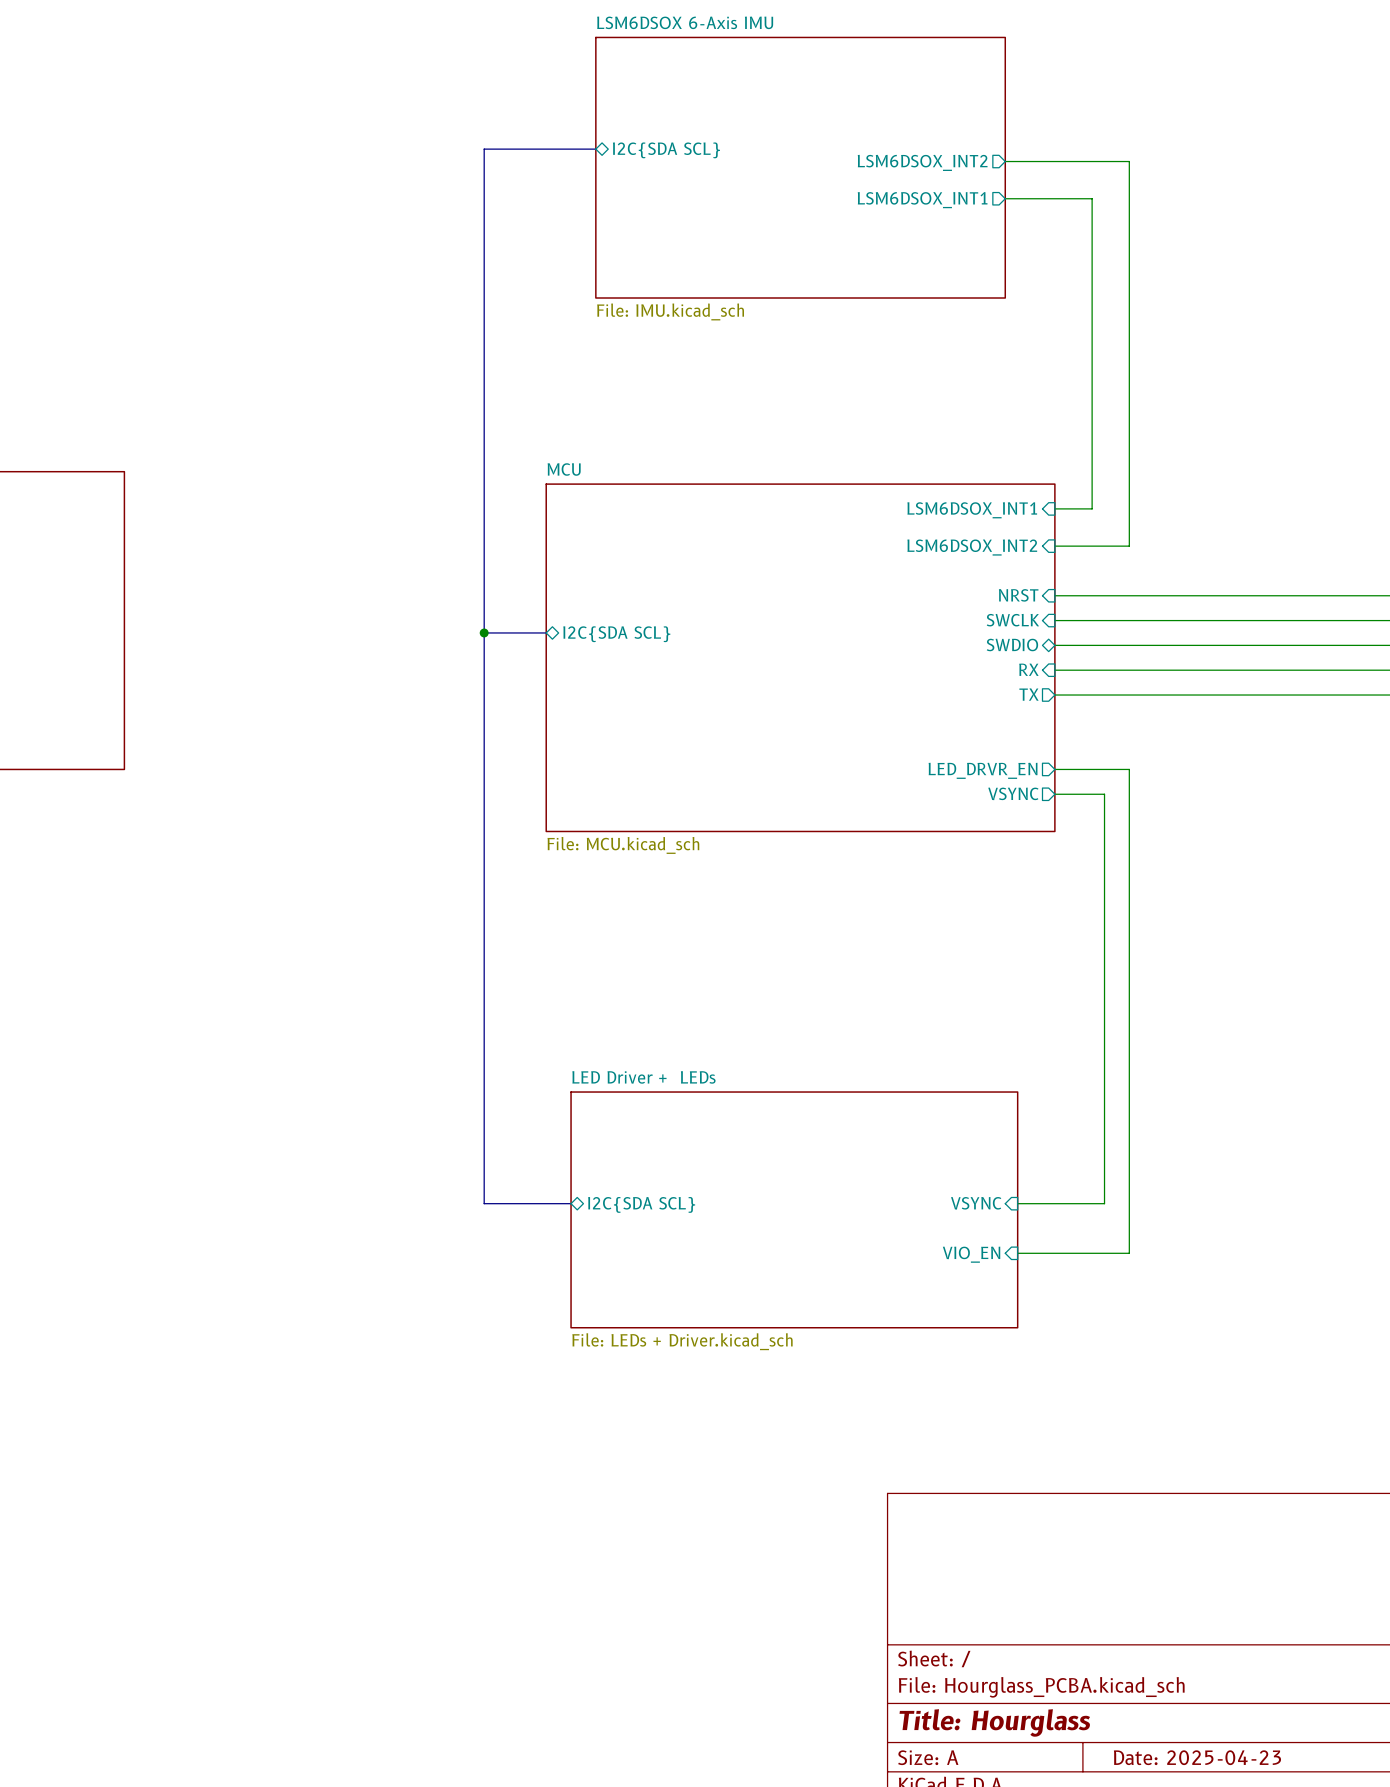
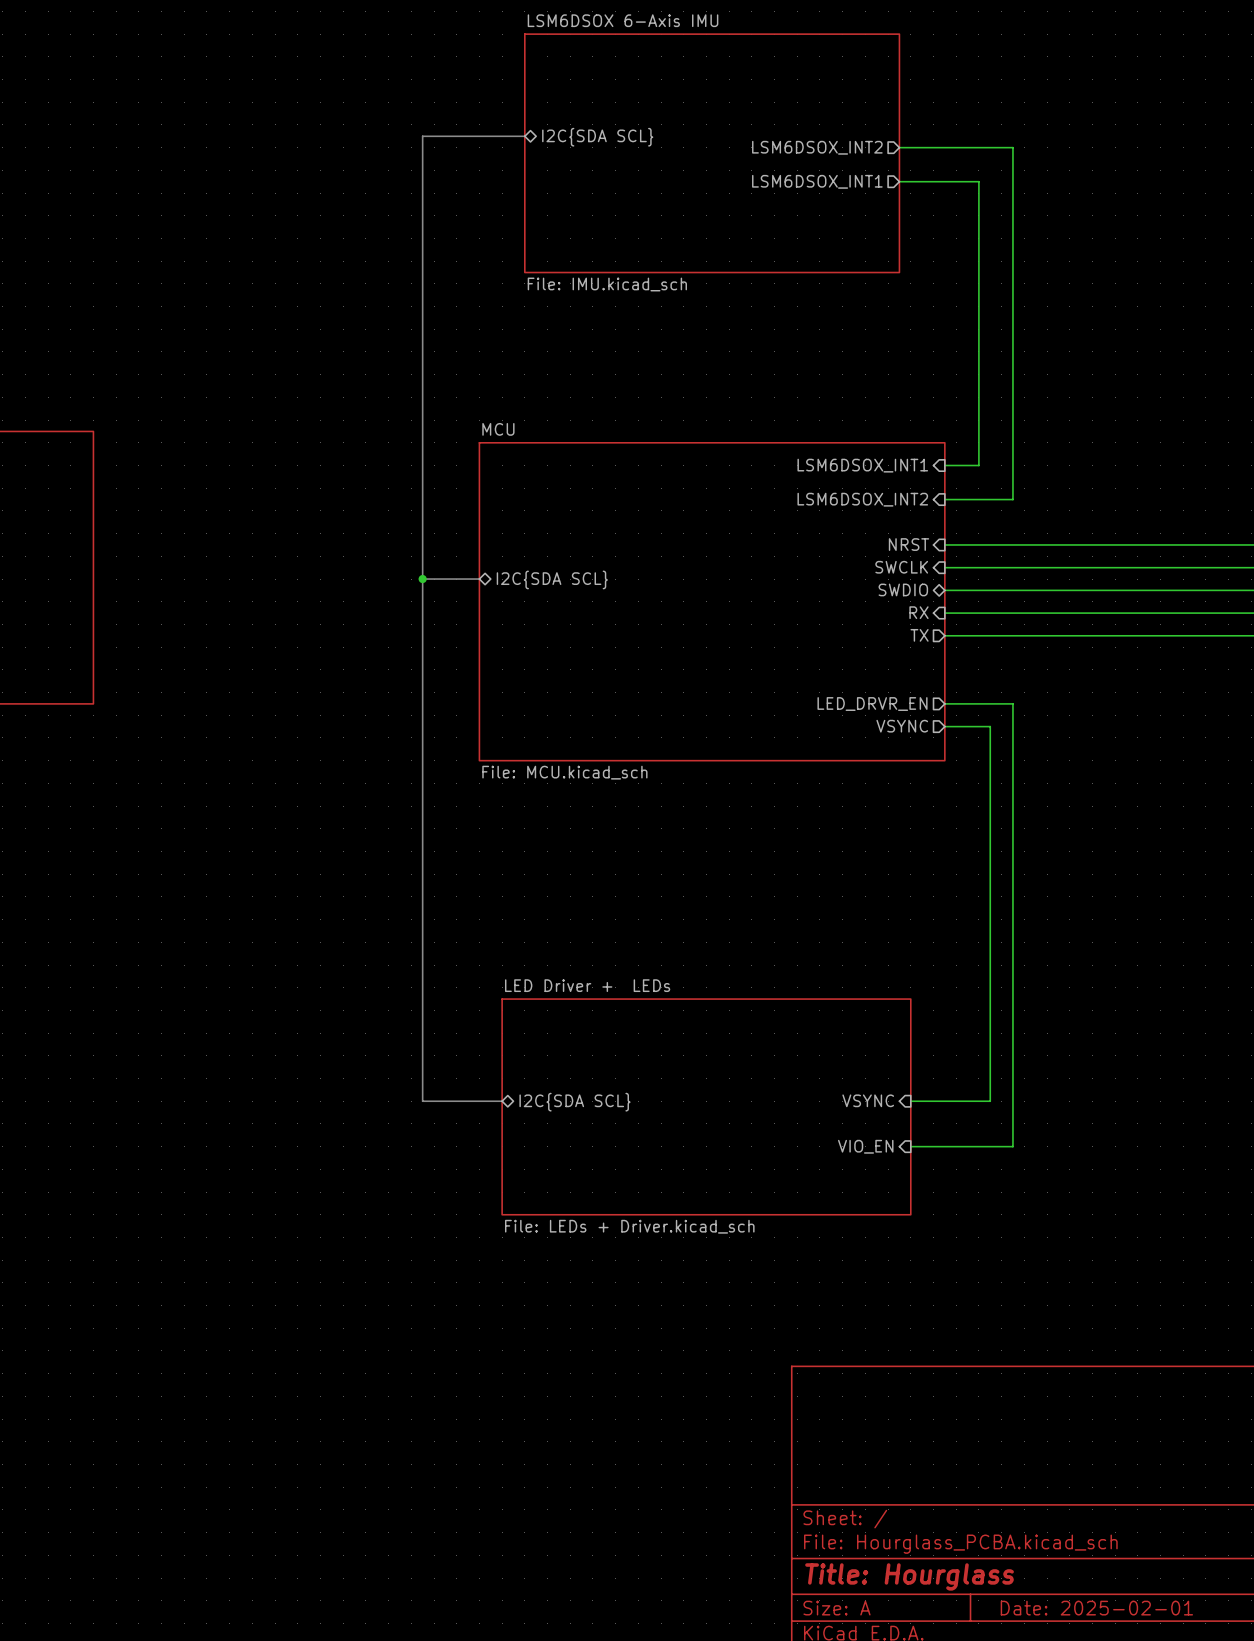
title block: Date: 2025-04-23 (1197, 1757) -> Date: 2025-02-01 (1096, 1608)

